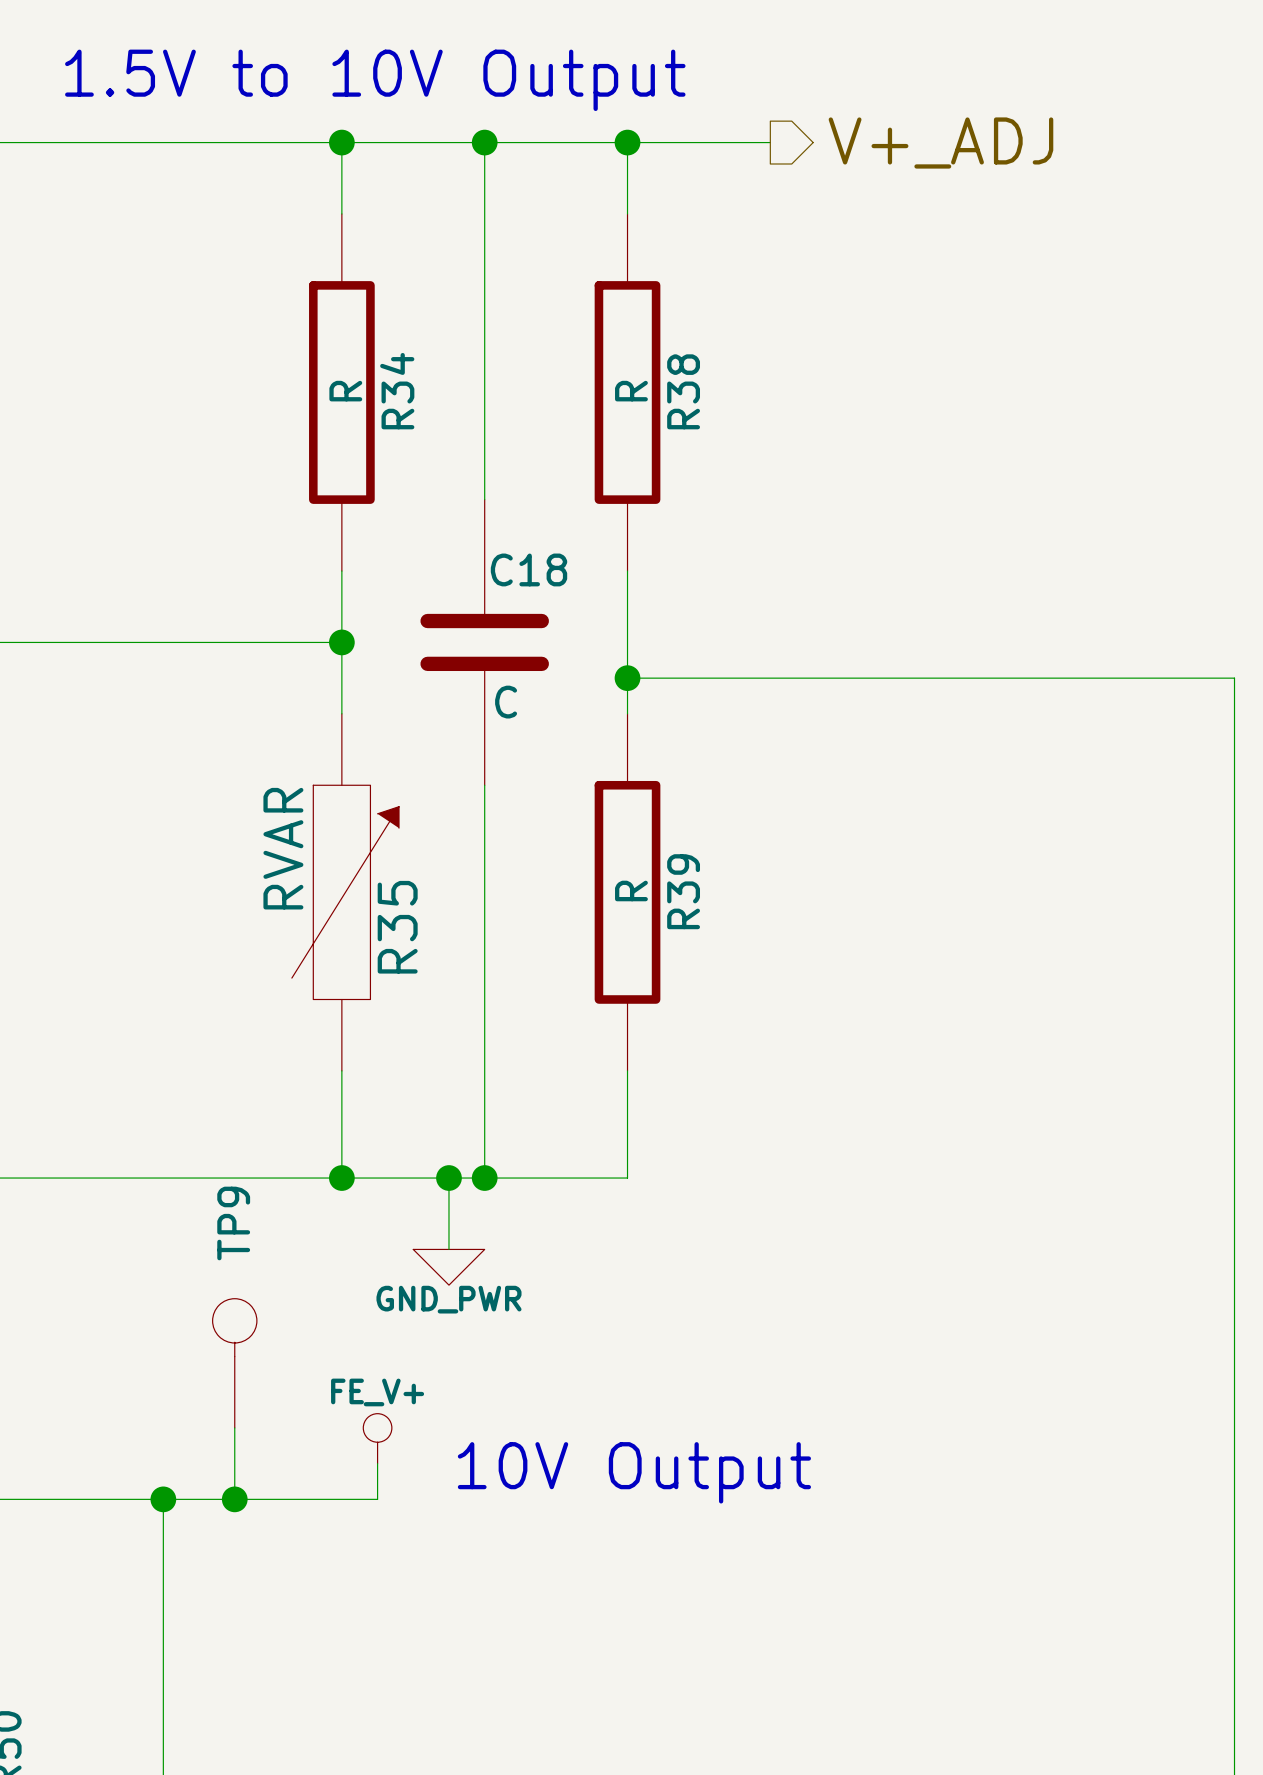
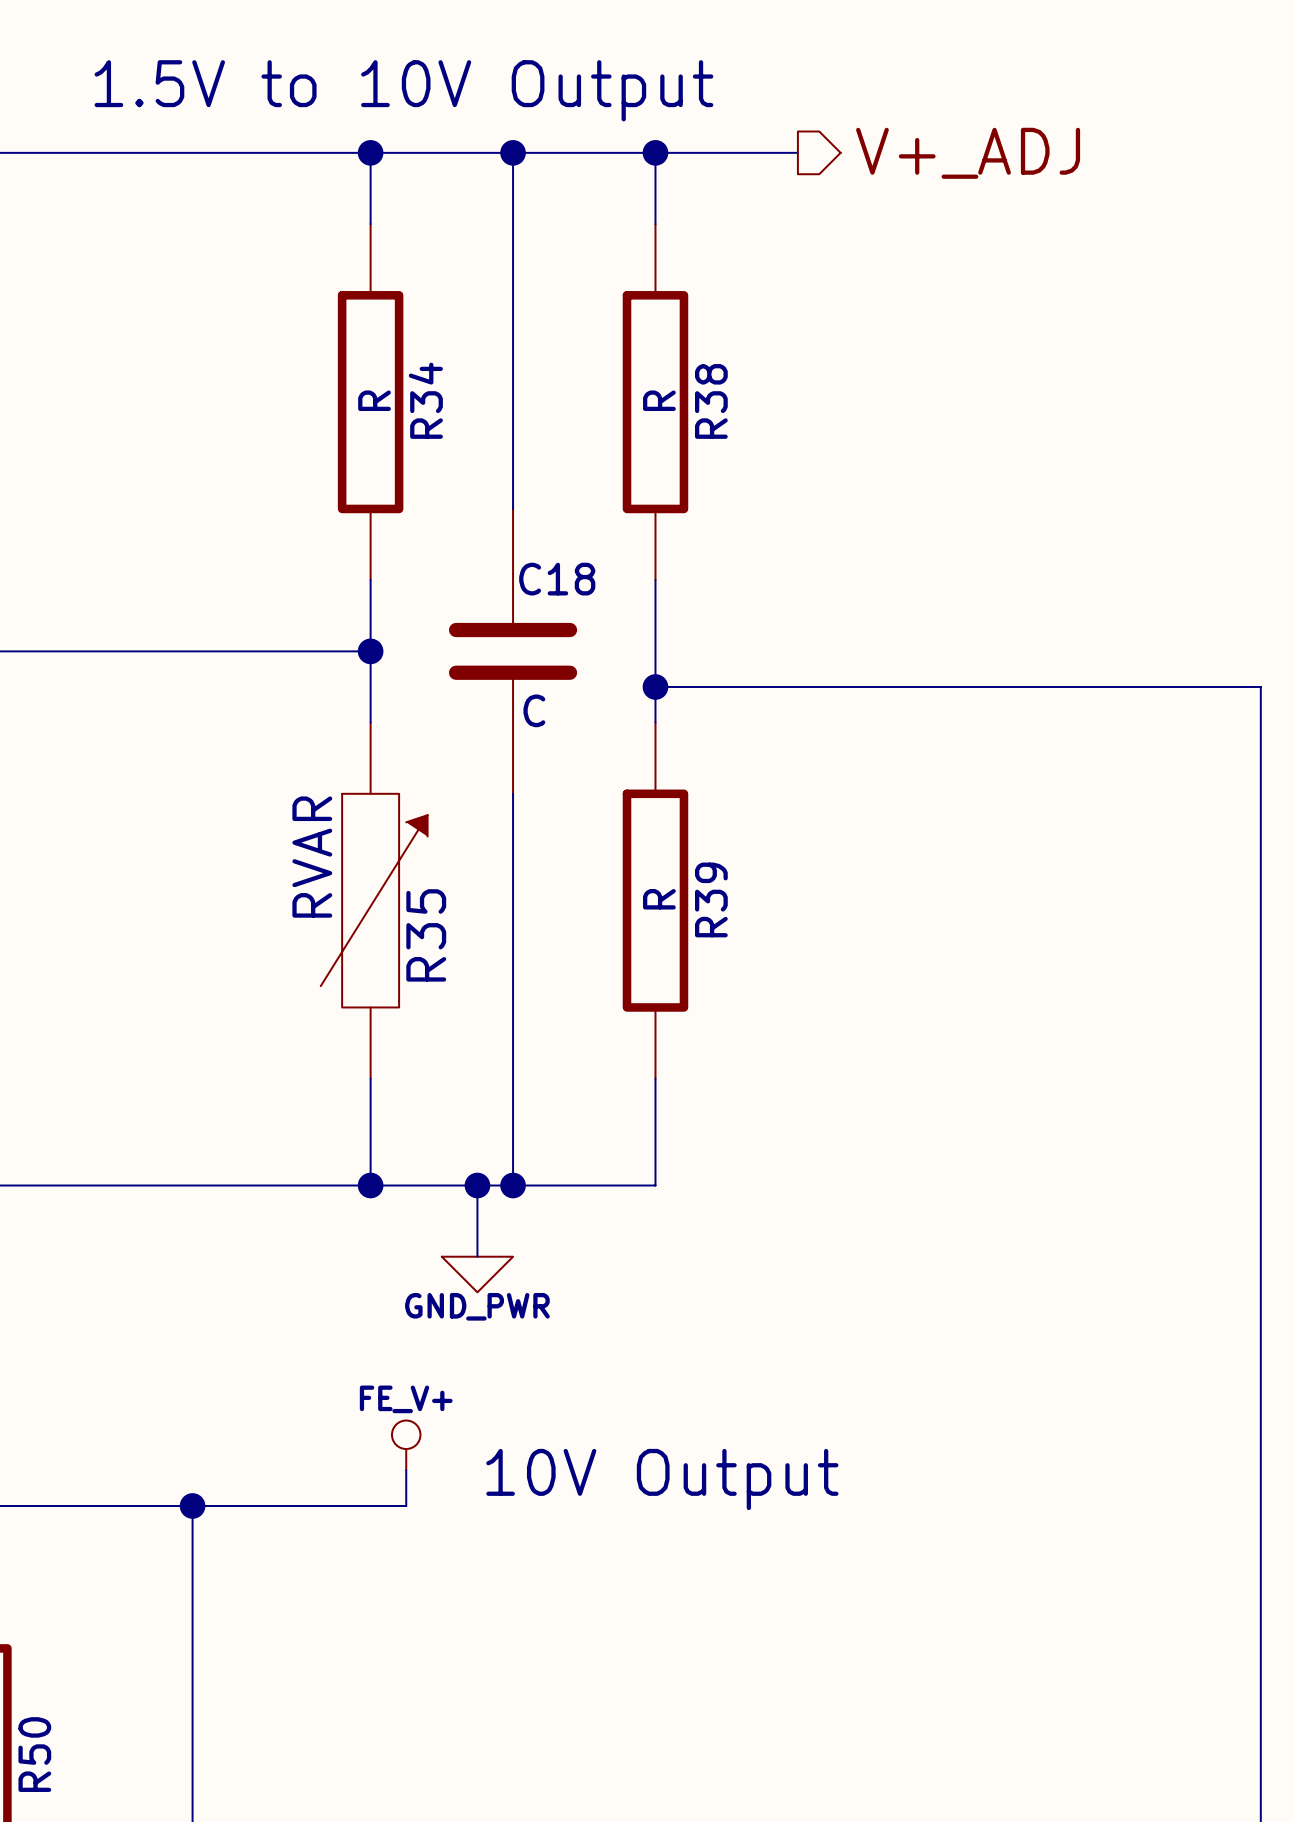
TP9: (234, 1363) -> none
wire: (234, 1427) (234, 1499) -> none
junction: (234, 1499) -> none

